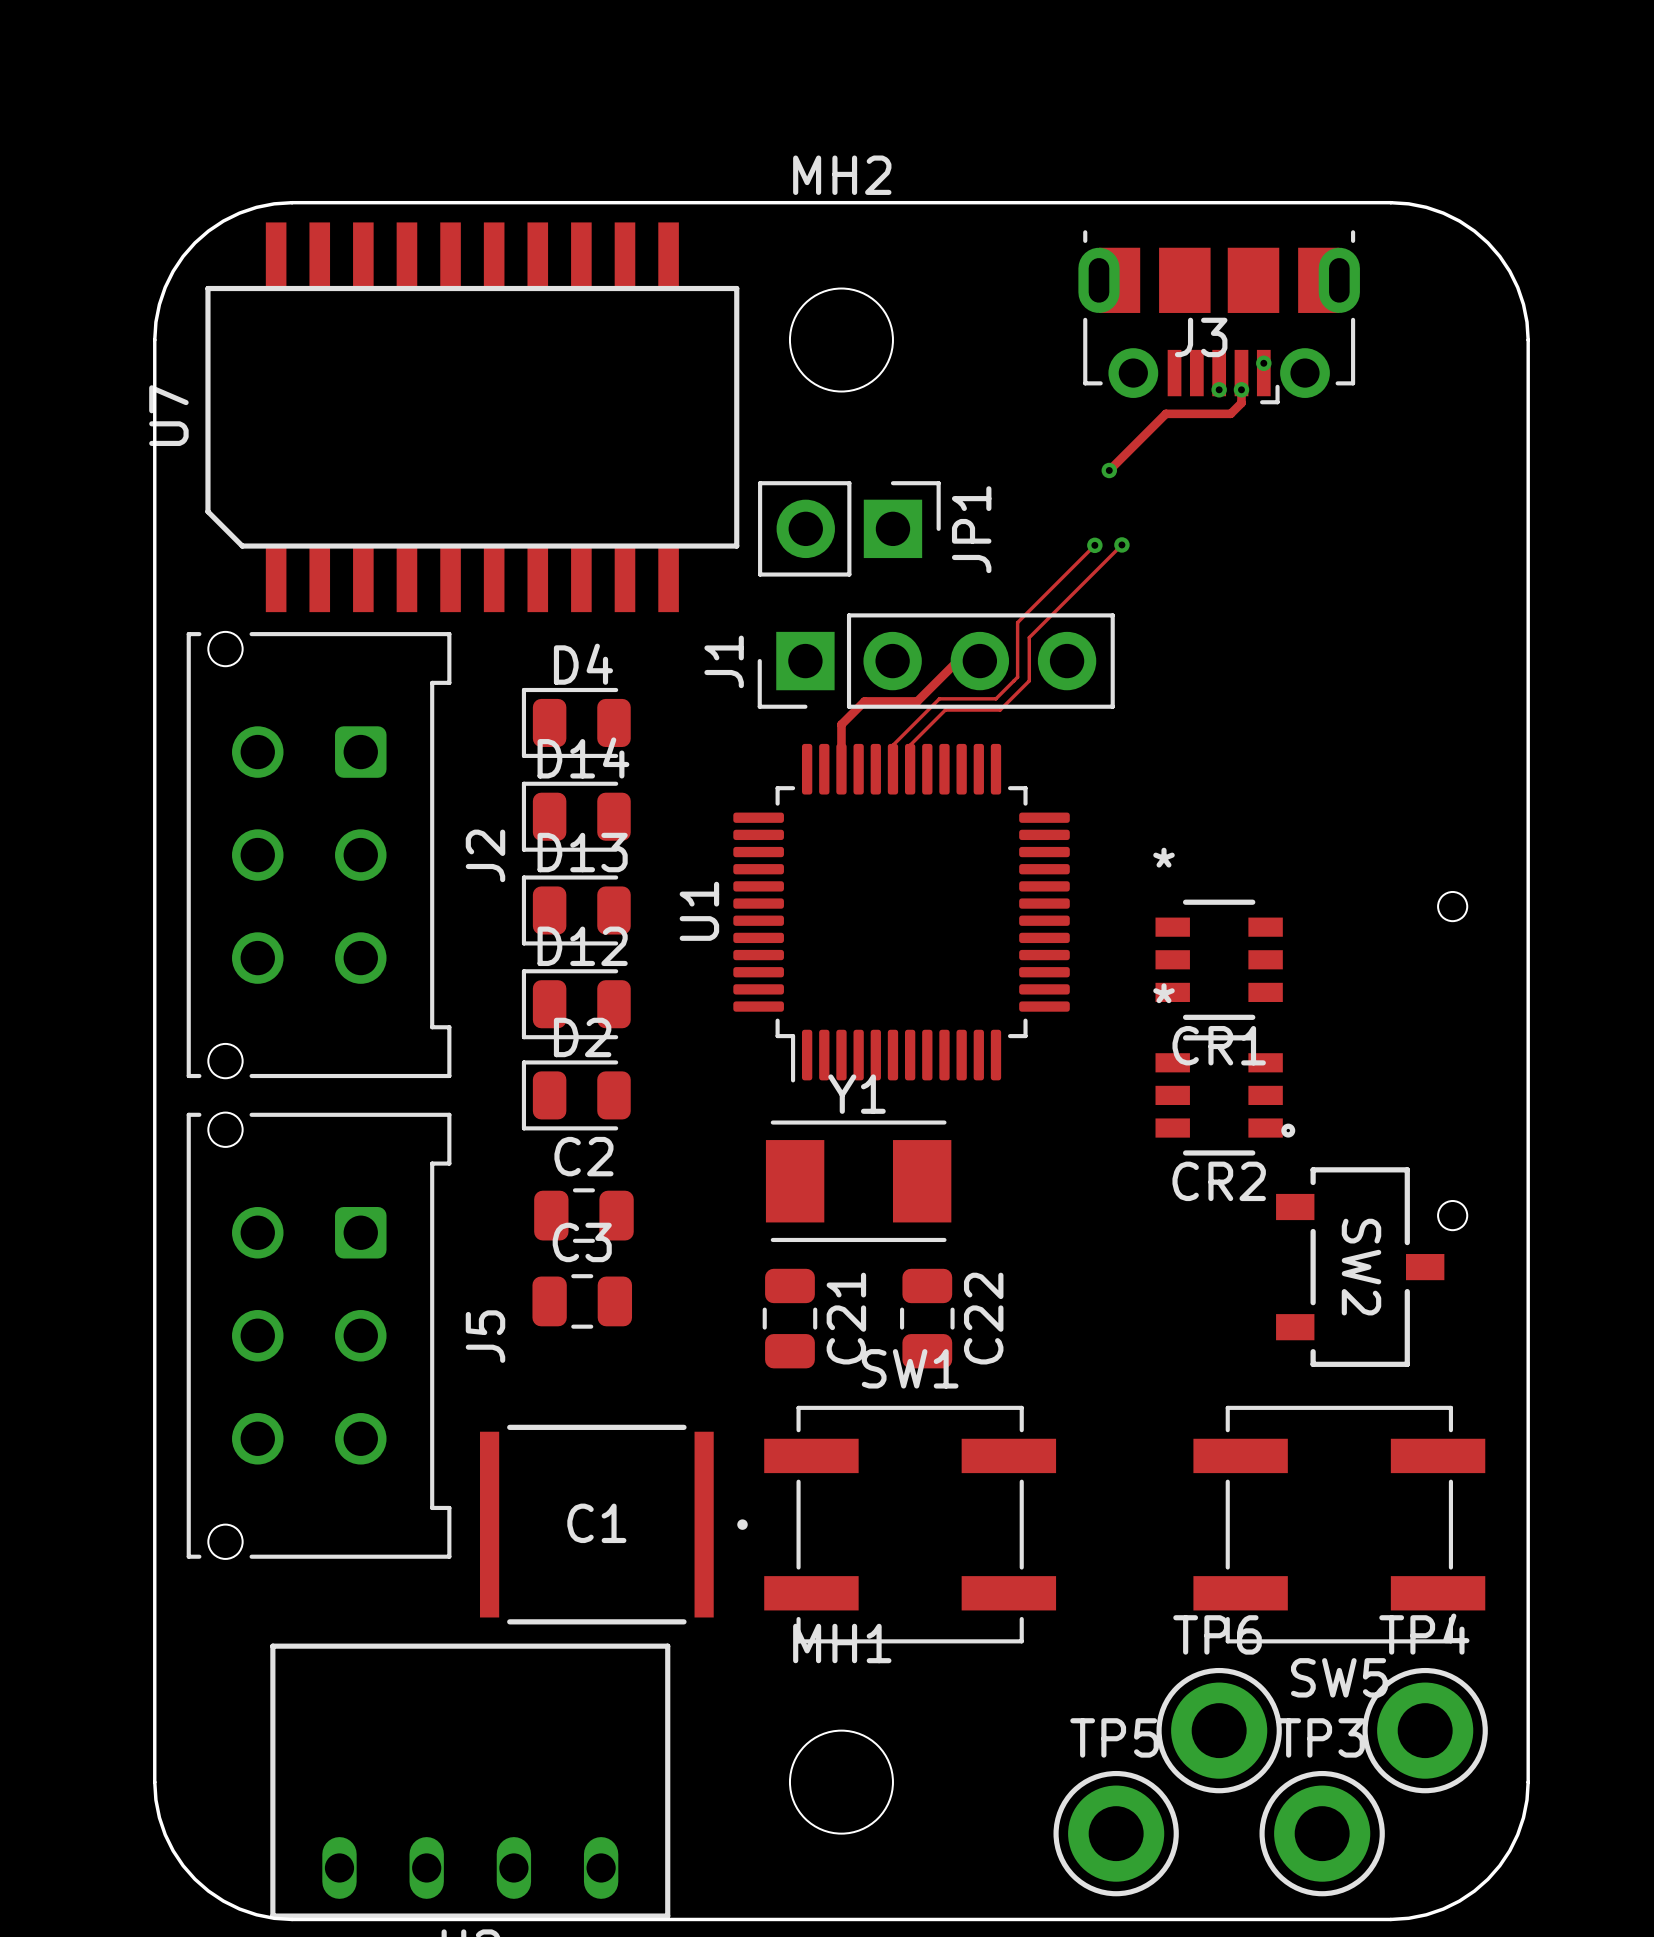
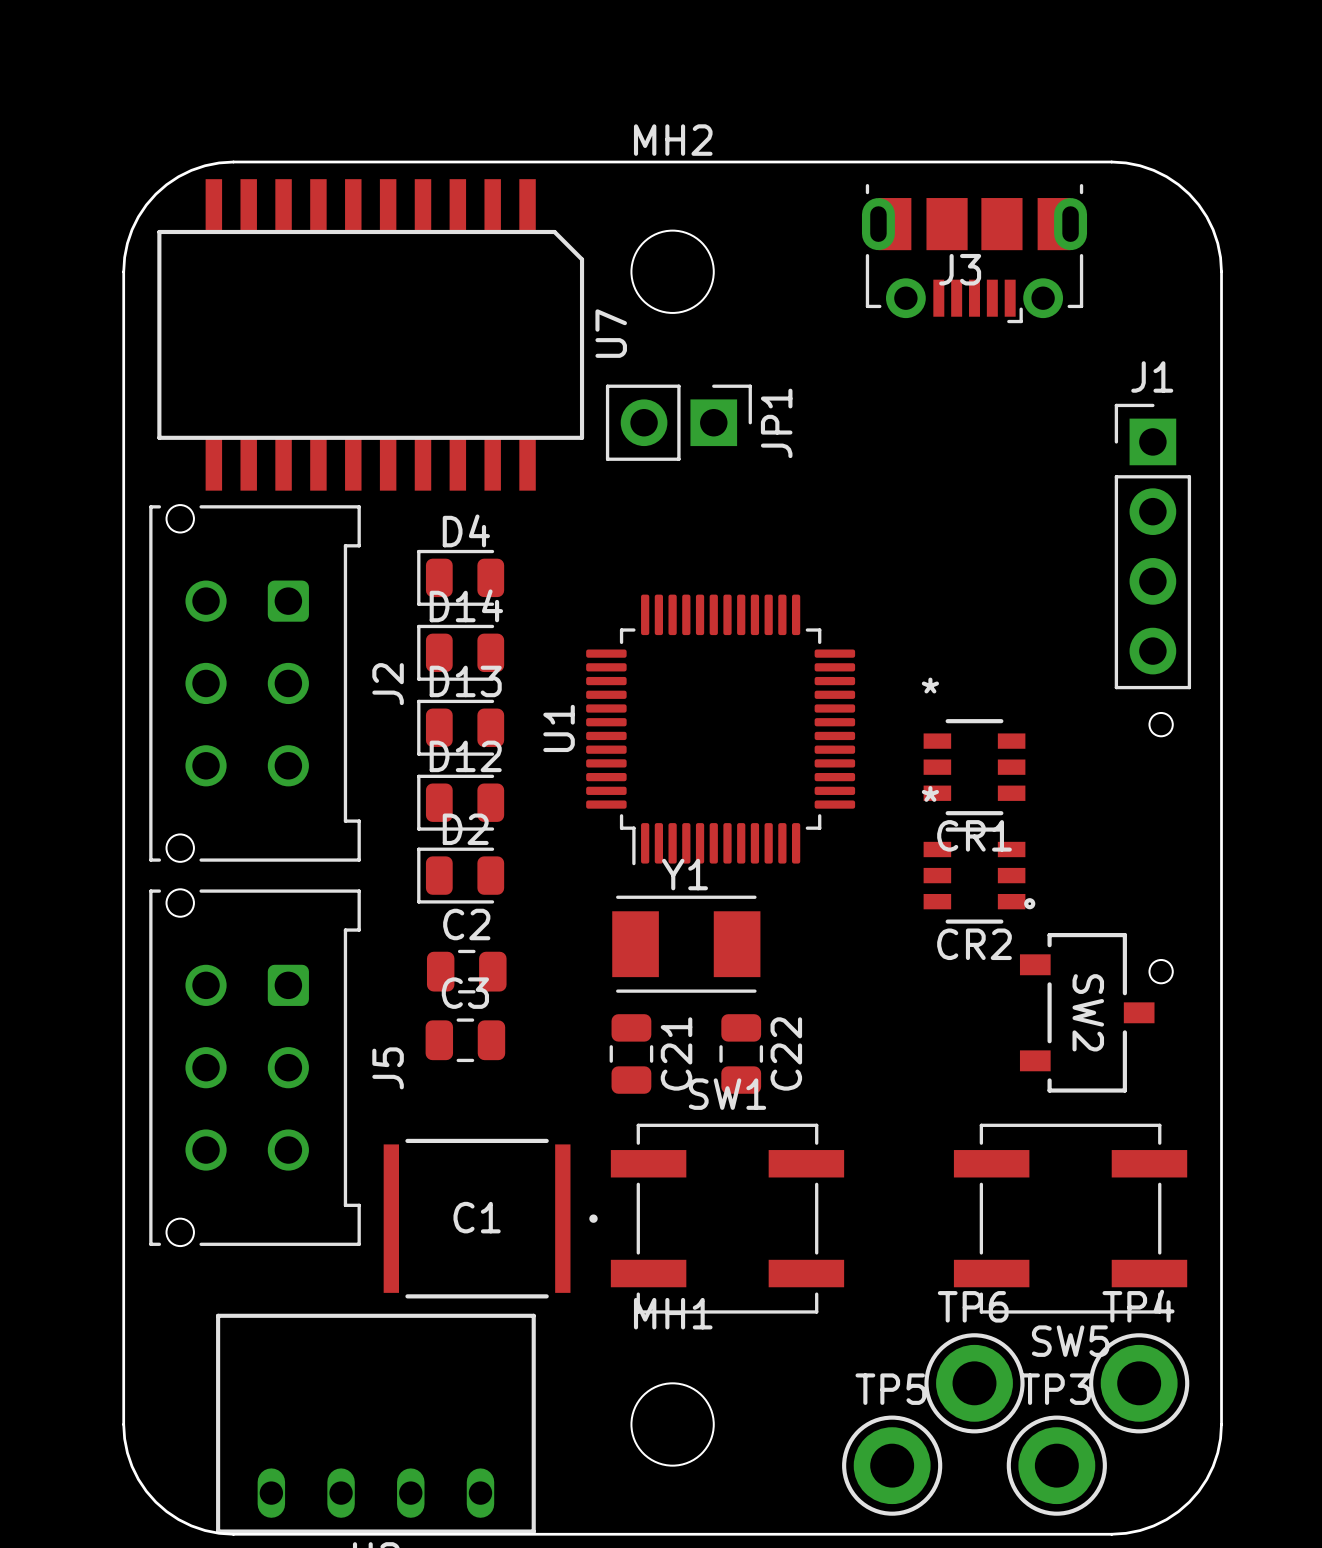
via: (1263, 363) -> none
via: (1219, 389) -> none
track: (1241, 389) (1241, 403) (1230, 413) (1165, 413) (1109, 470) -> none
via: (1241, 389) -> none
U7 rotation: 0° (472, 417) -> 180° (370, 334)
via: (1109, 470) -> none
track: (1121, 544) (1029, 637) (1029, 680) (1000, 710) (945, 710) (910, 745) (910, 769) -> none
via: (1121, 544) -> none
track: (1094, 545) (1017, 622) (1017, 677) (995, 698) (939, 698) (892, 745) (892, 769) -> none
via: (1094, 545) -> none
J1 rotation: 0° (936, 661) -> 90° clockwise (1152, 546)
J1 position: (936, 661) -> (1152, 546)
track: (979, 661) (957, 661) (917, 701) (864, 701) (841, 724) (841, 769) -> none

